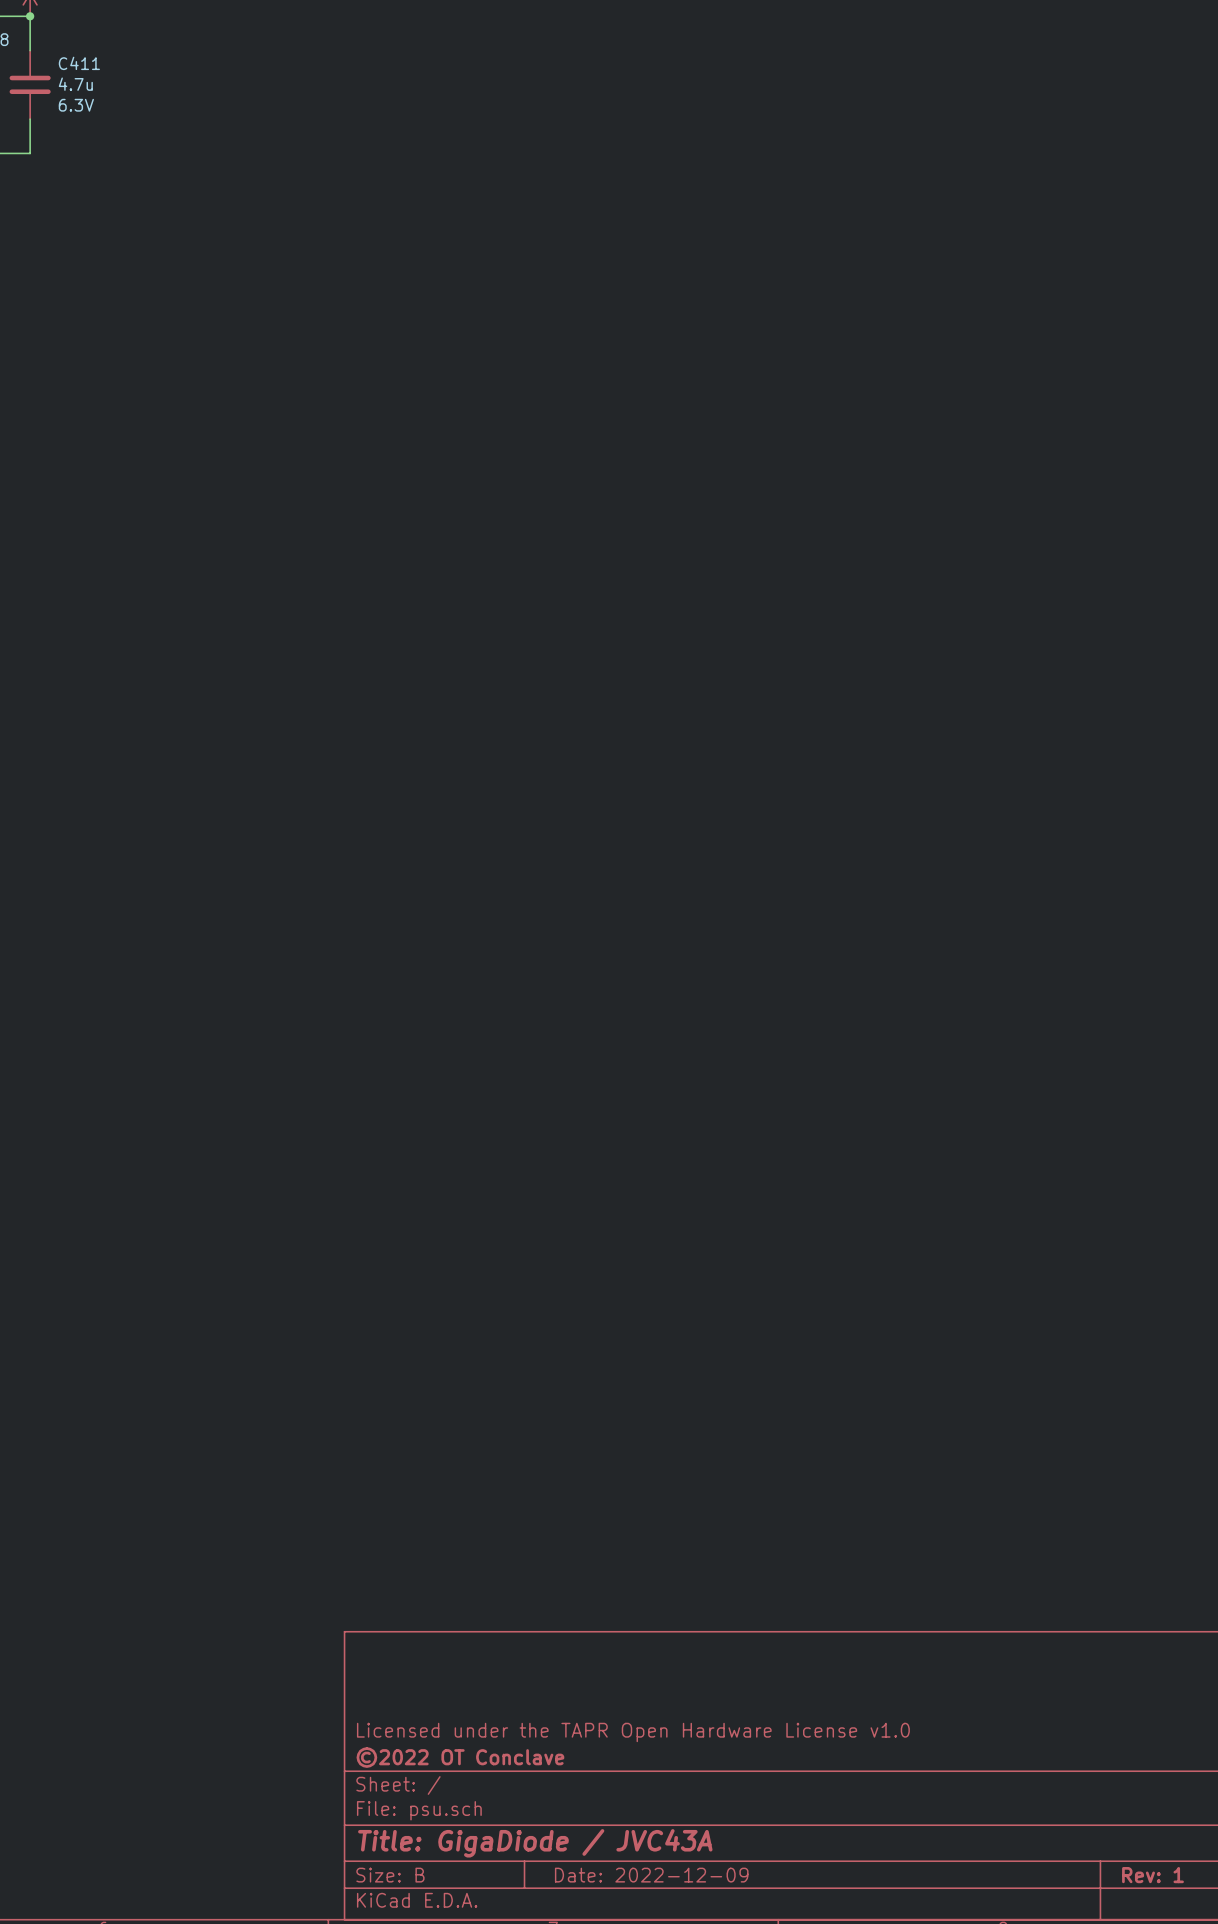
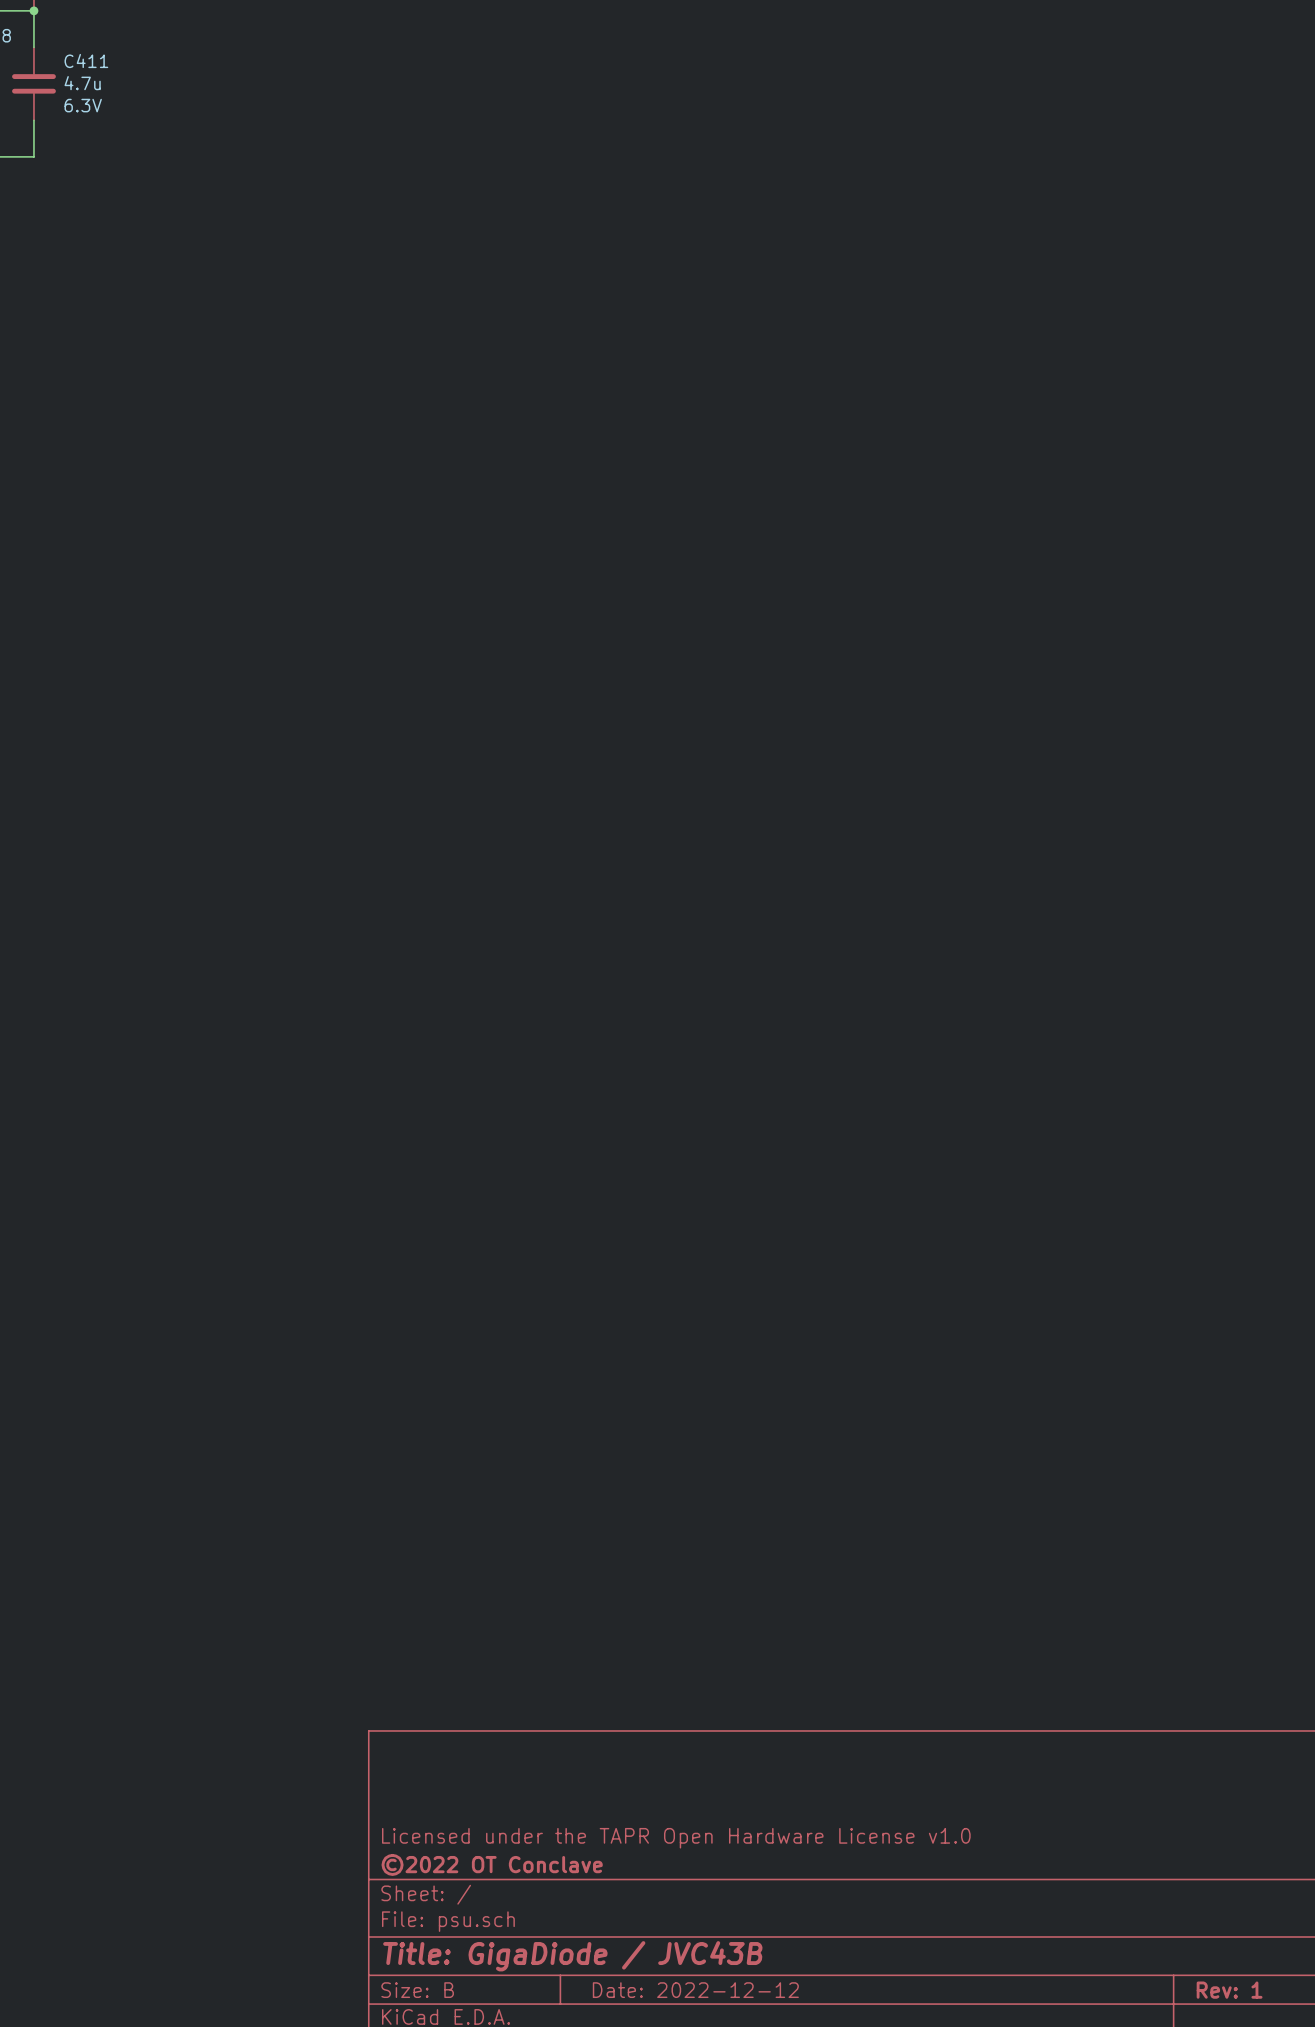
title block: Title: GigaDiode / JVC43A (535, 1843) -> Title: GigaDiode / JVC43B (572, 1956)
title block: Date: 2022-12-09 (651, 1875) -> Date: 2022-12-12 (695, 1990)

